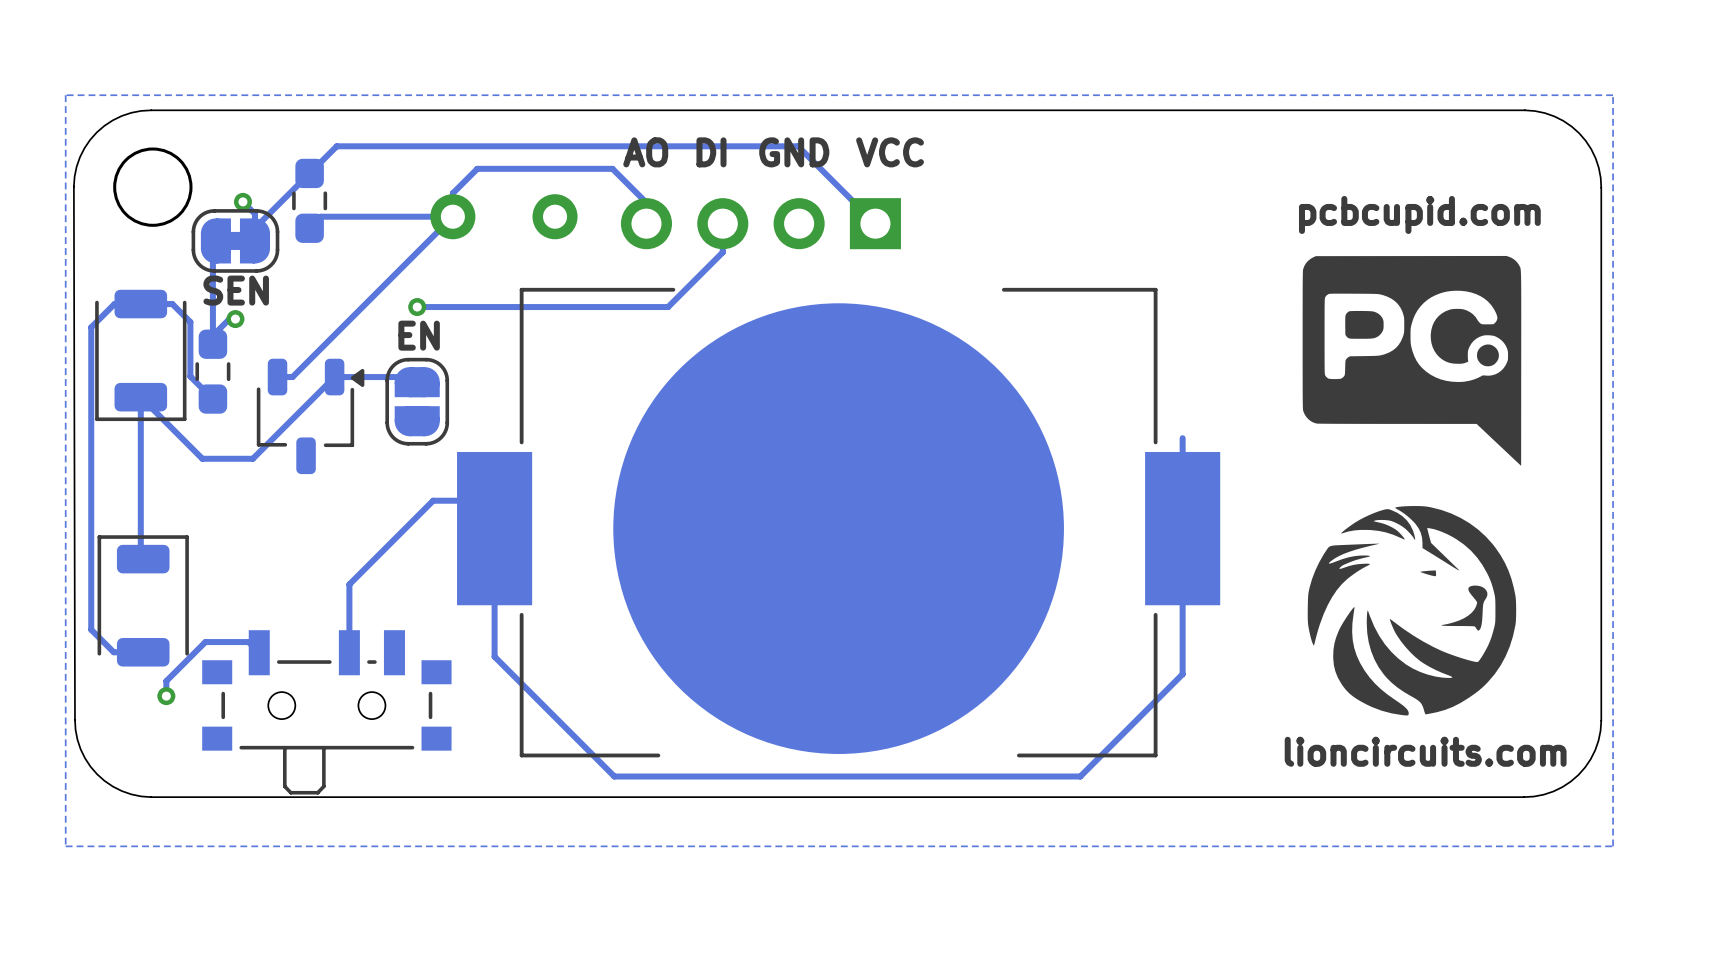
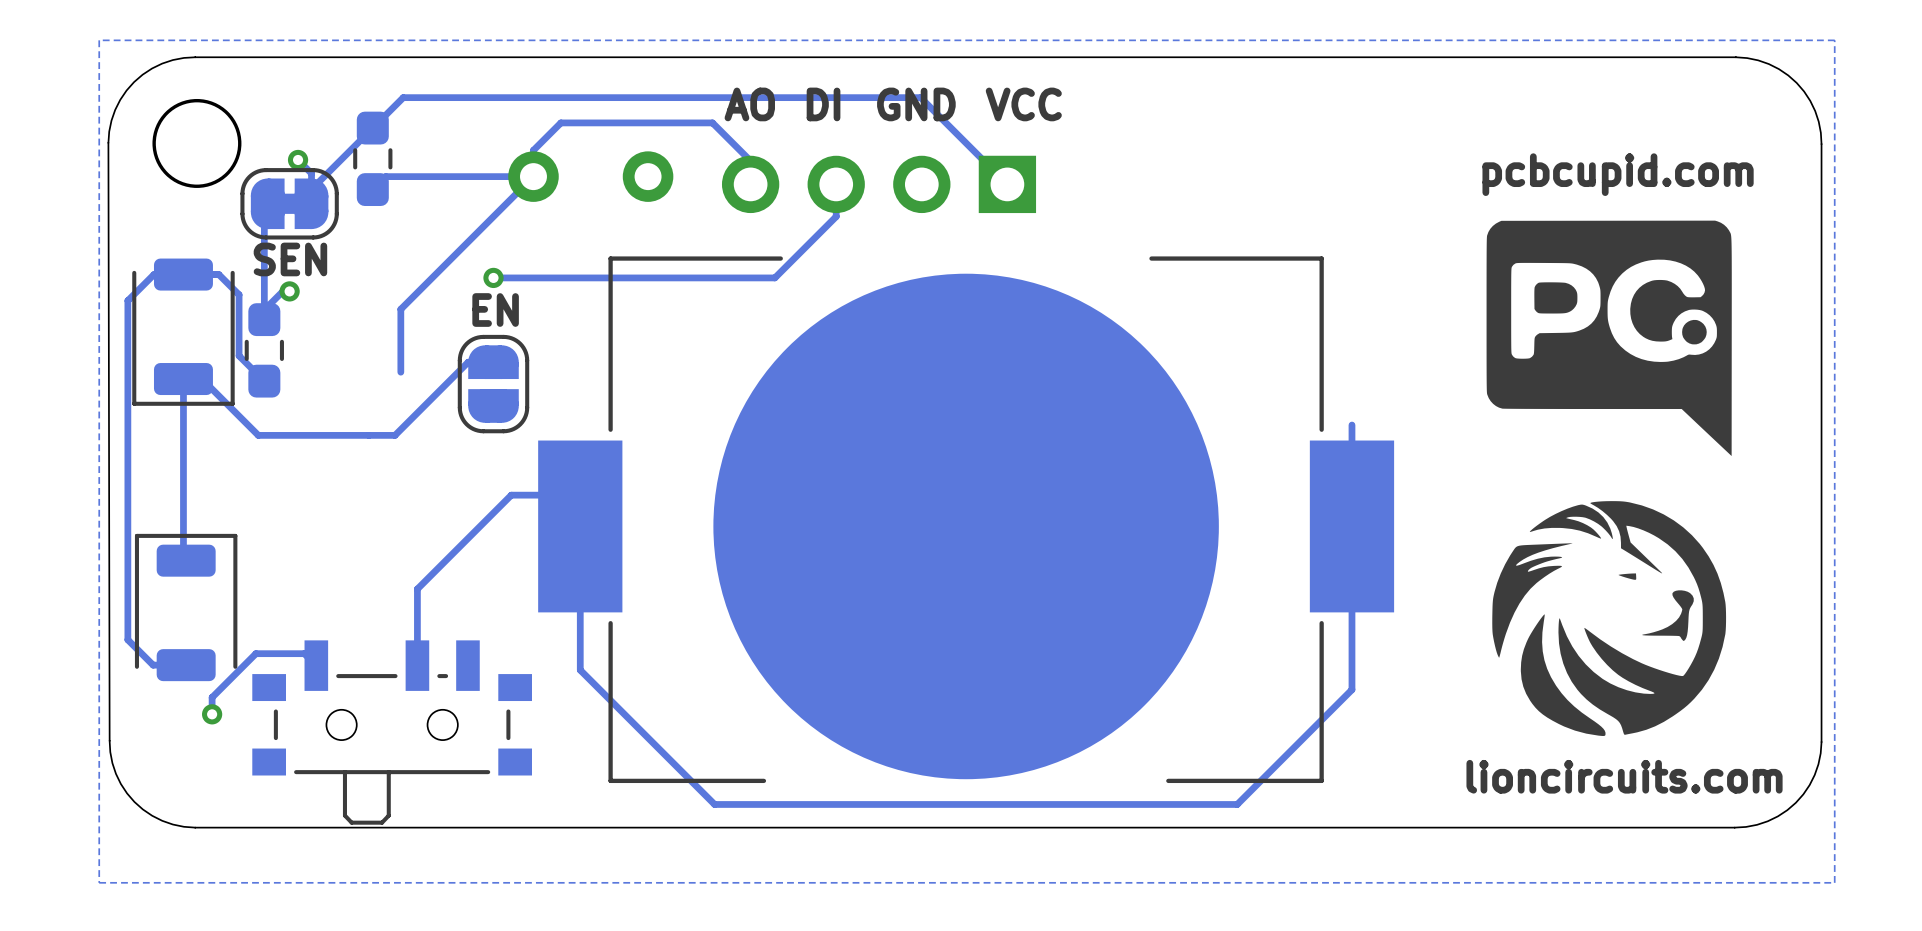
track: (334, 334) (292, 377) (277, 377) -> (400, 309) (400, 372)
track: (417, 382) (412, 377) (334, 377) (252, 458) (202, 458) (140, 397) -> (493, 362) (468, 362) (395, 435) (258, 435) (202, 379) (183, 379)
part: (310, 416) -> none

